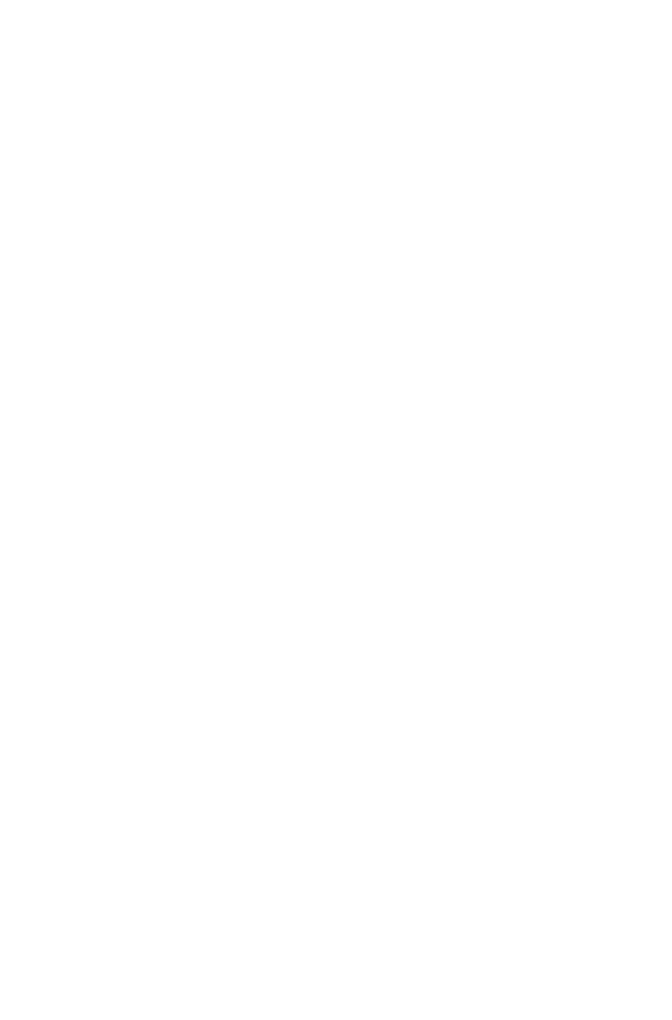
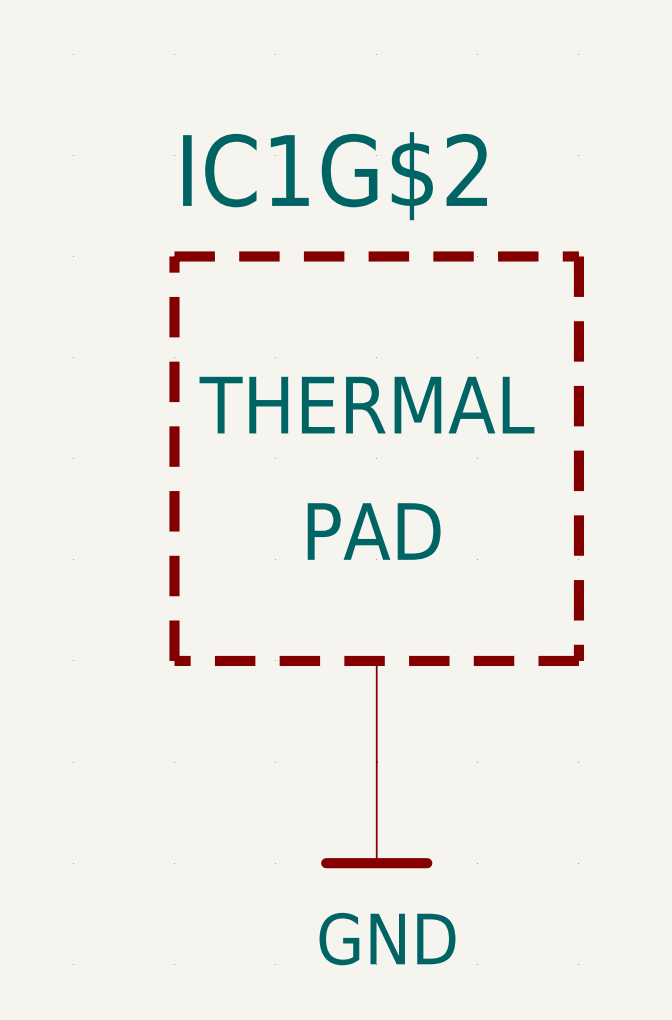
IC1G$2: none -> (376, 506)
power symbol: none -> GND (376, 815)

